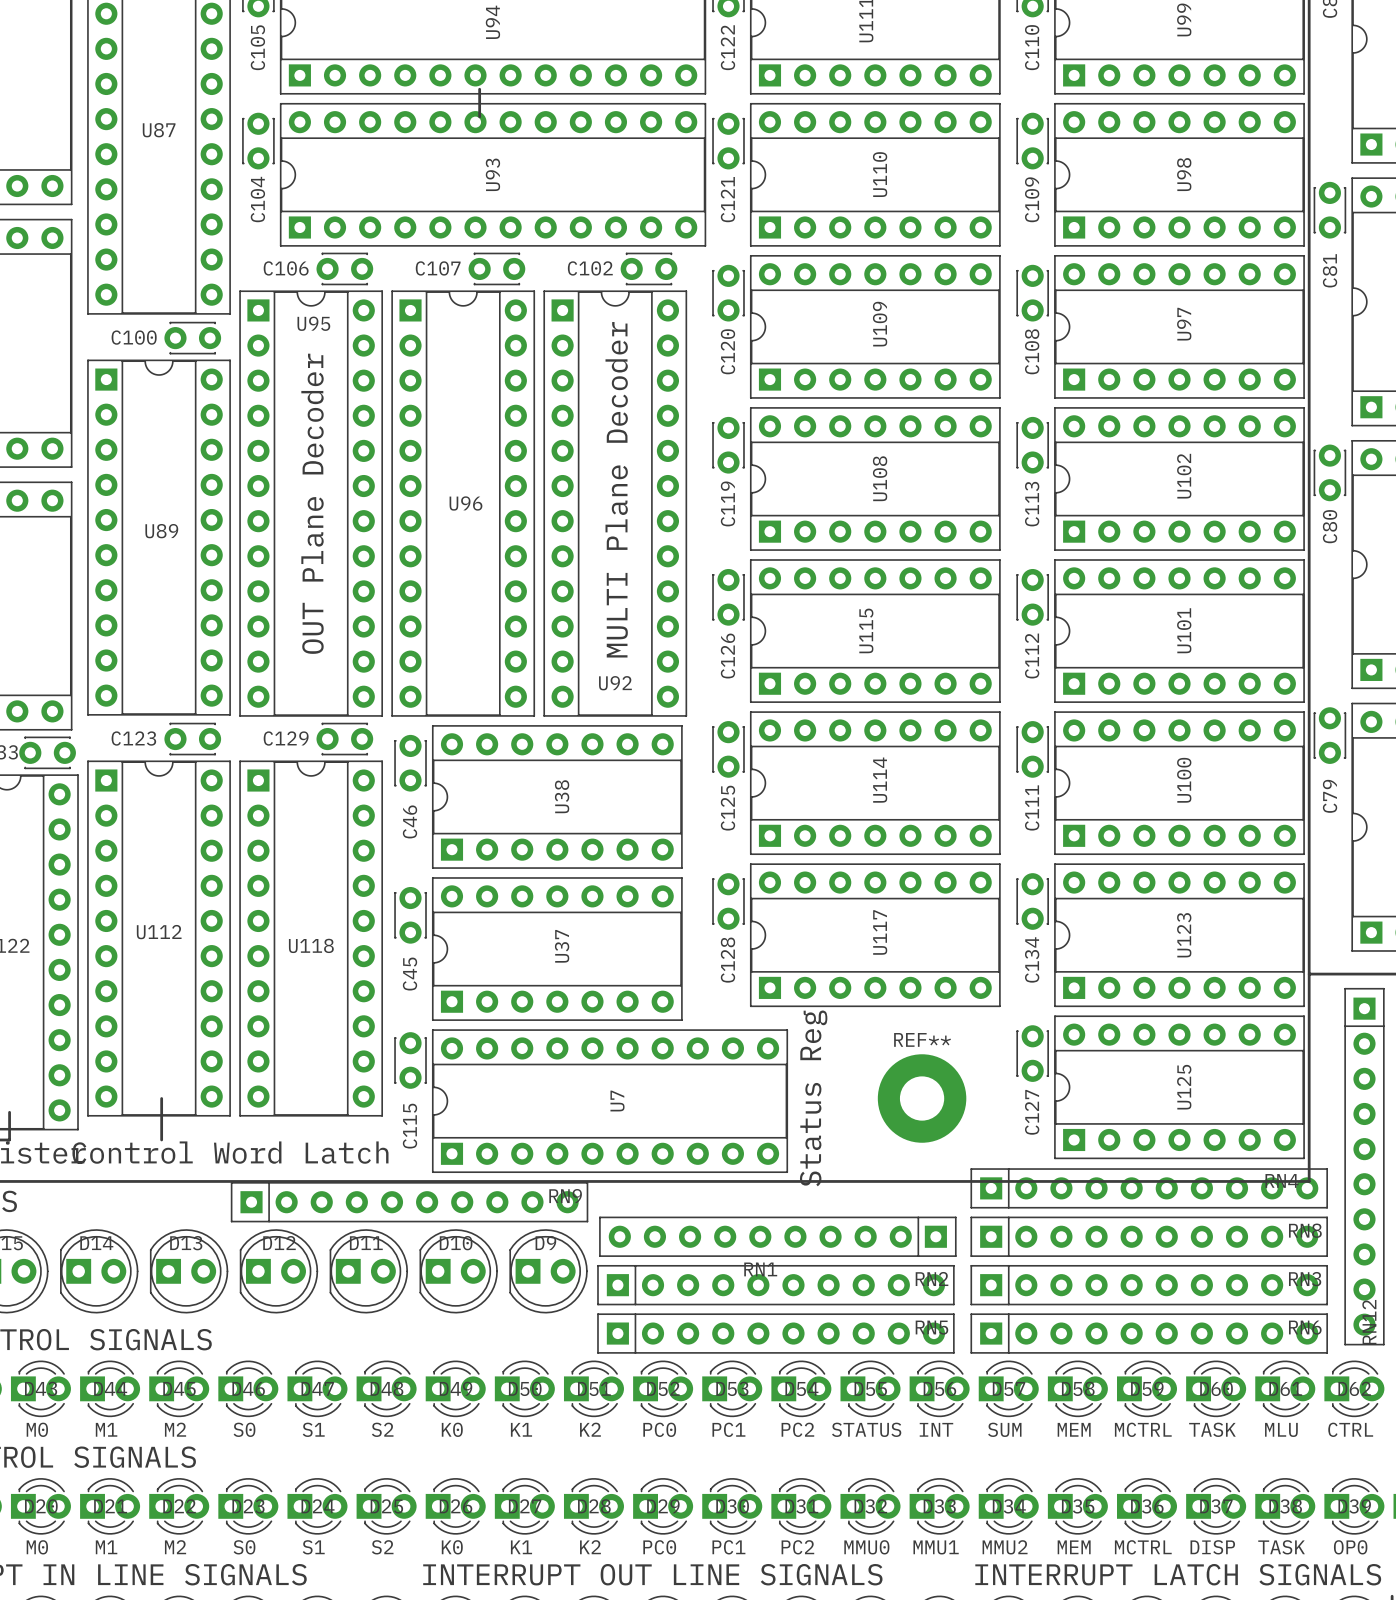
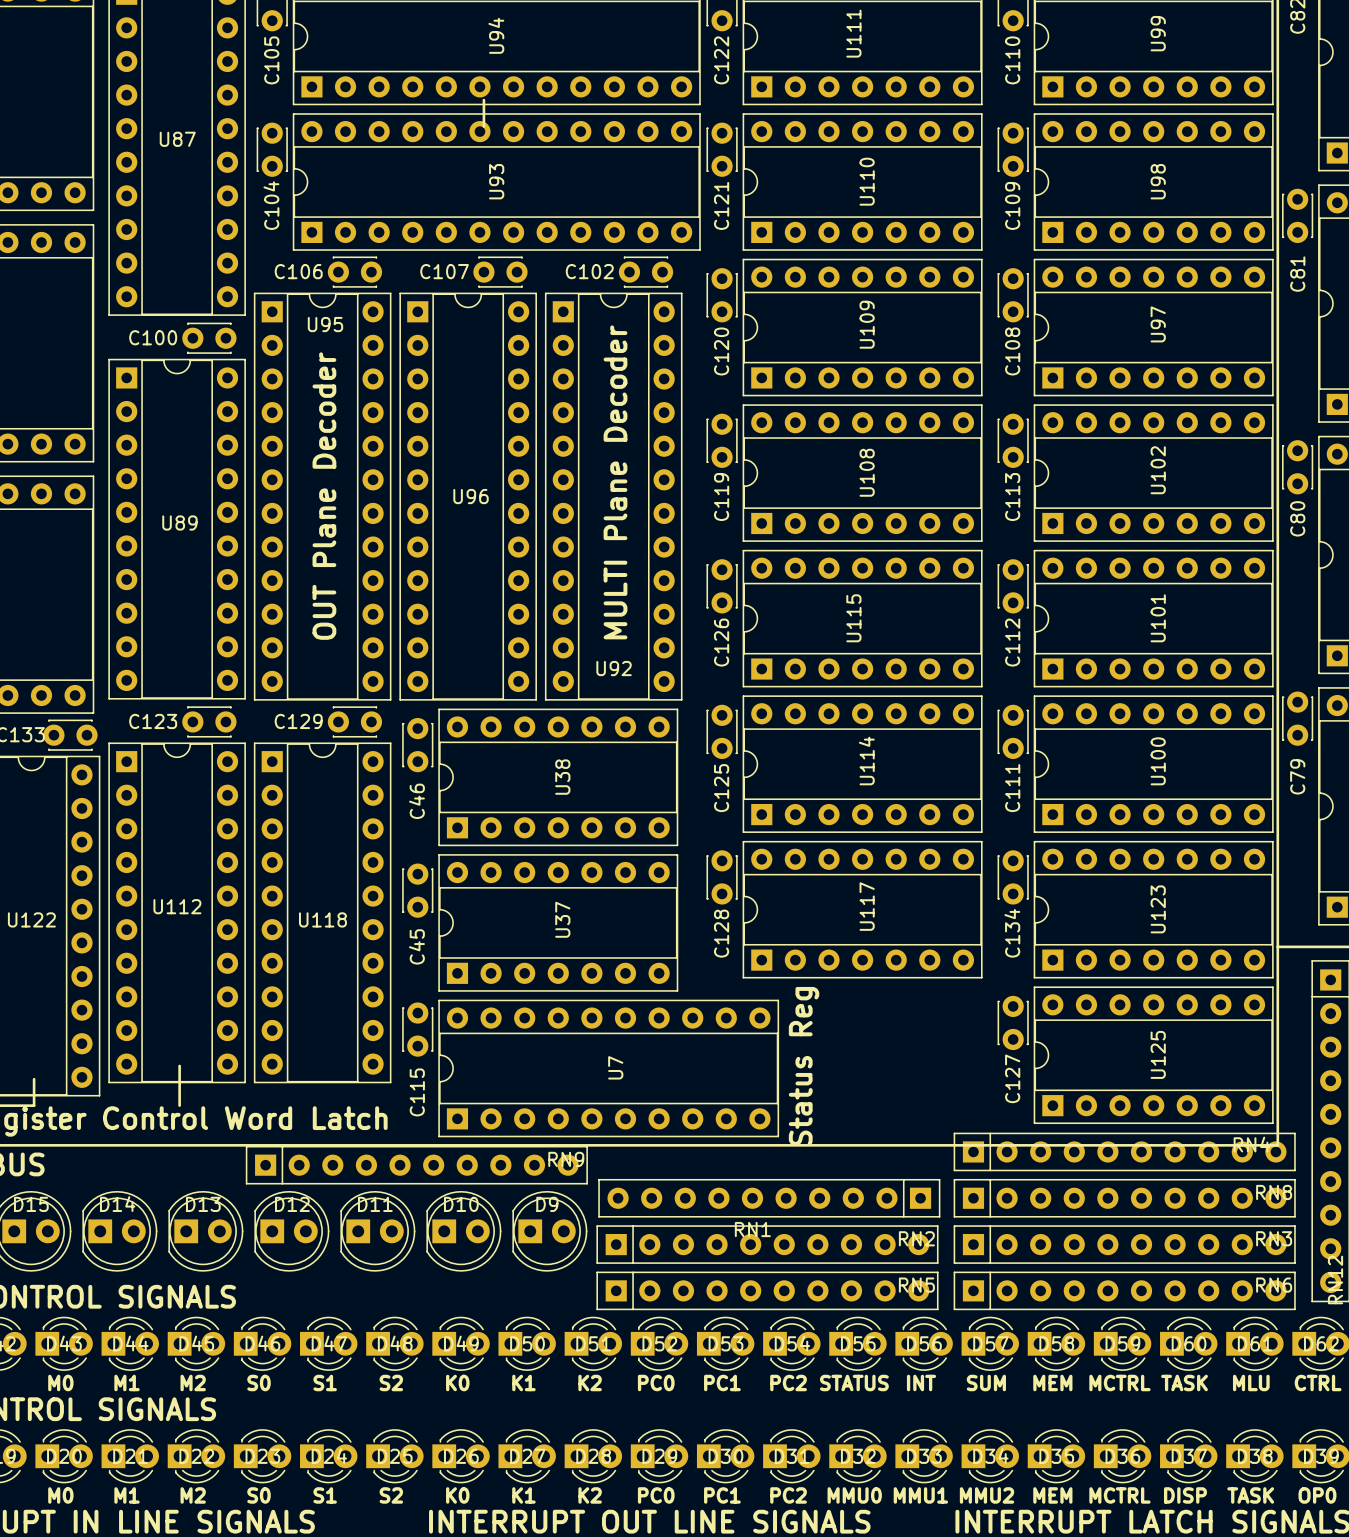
REF**: (922, 1098) -> none

